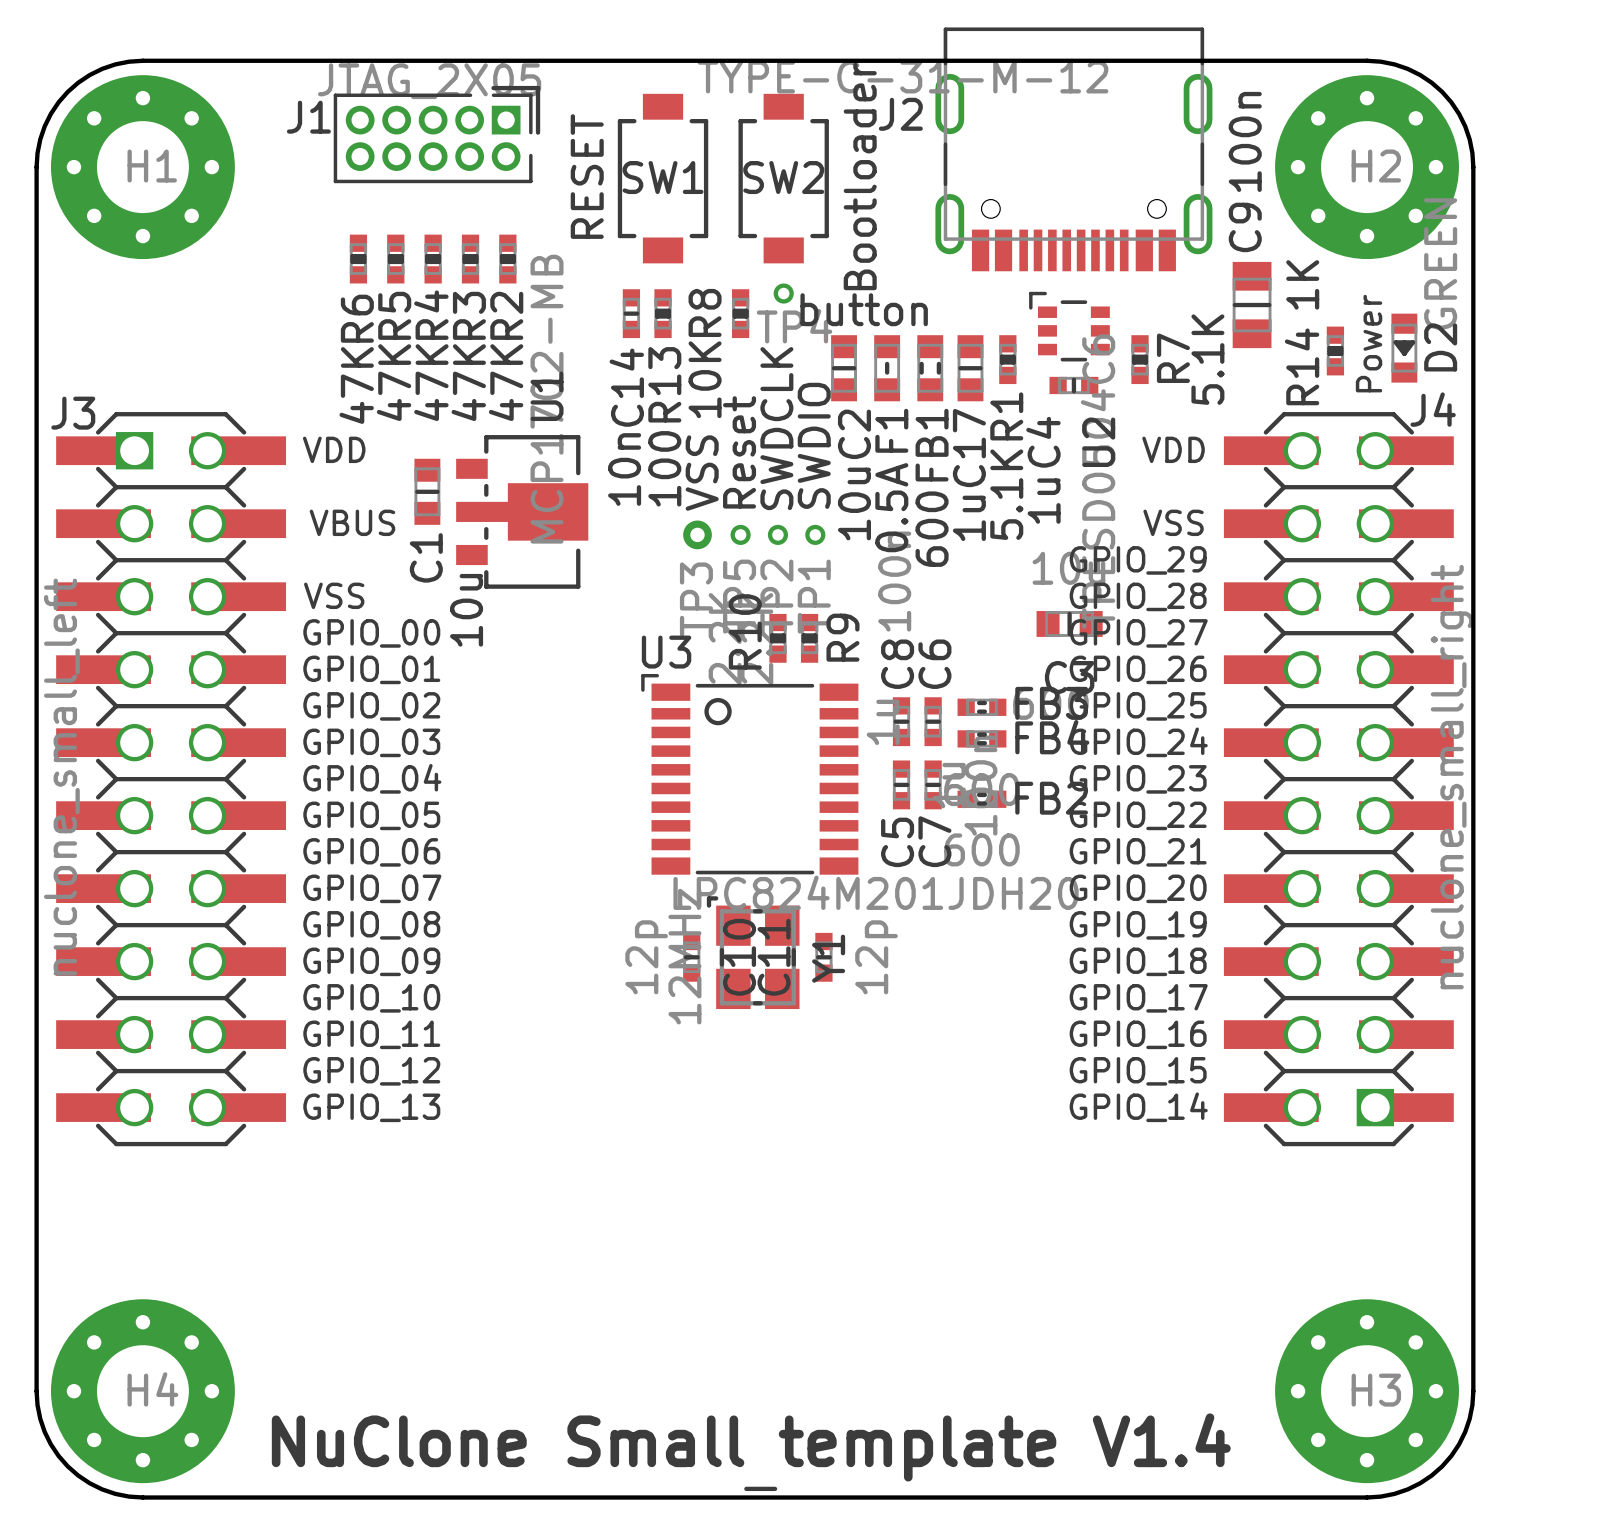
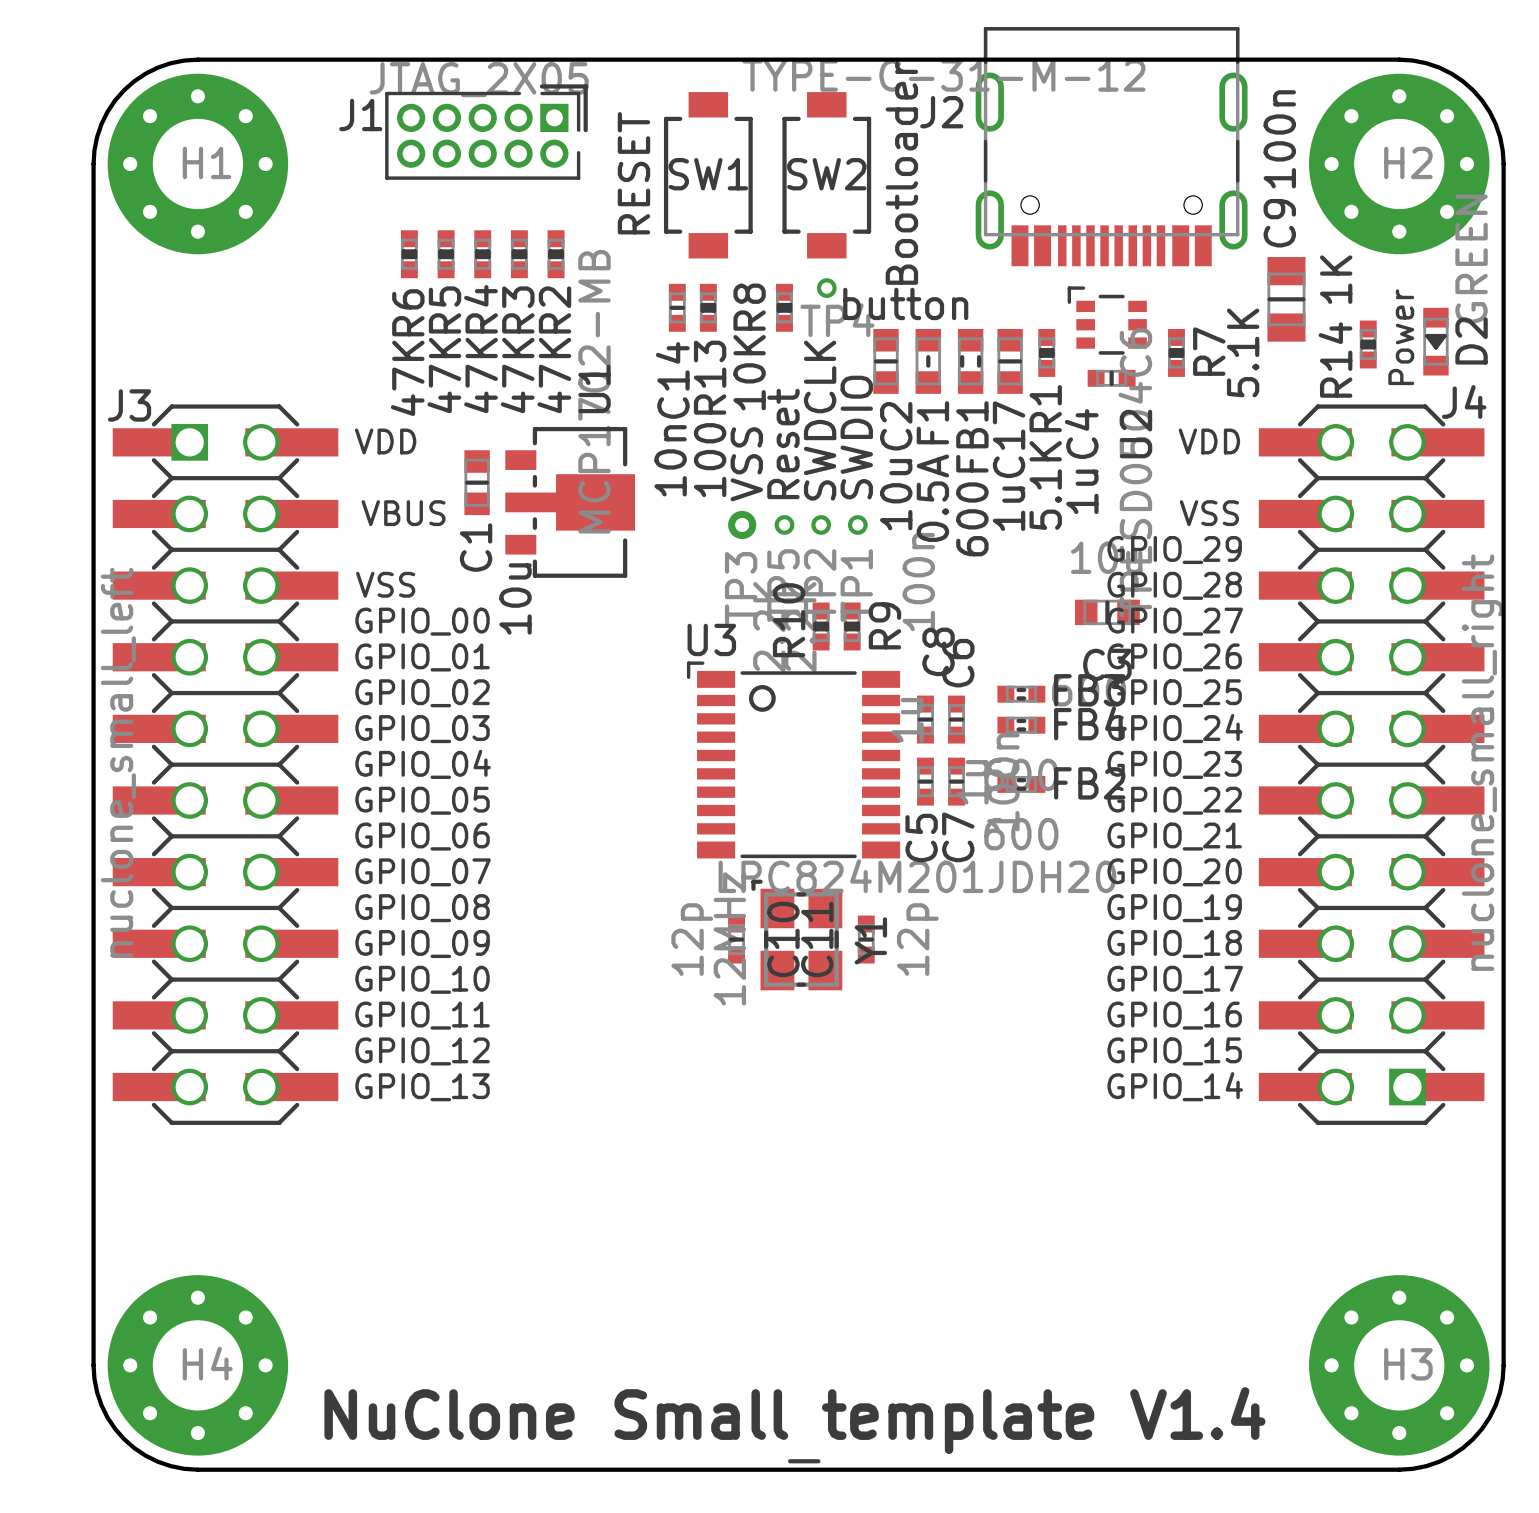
C8 position: (901, 721) -> (925, 719)
C6 position: (933, 721) -> (956, 719)
C5 position: (901, 784) -> (925, 781)
C7 position: (933, 784) -> (956, 781)

